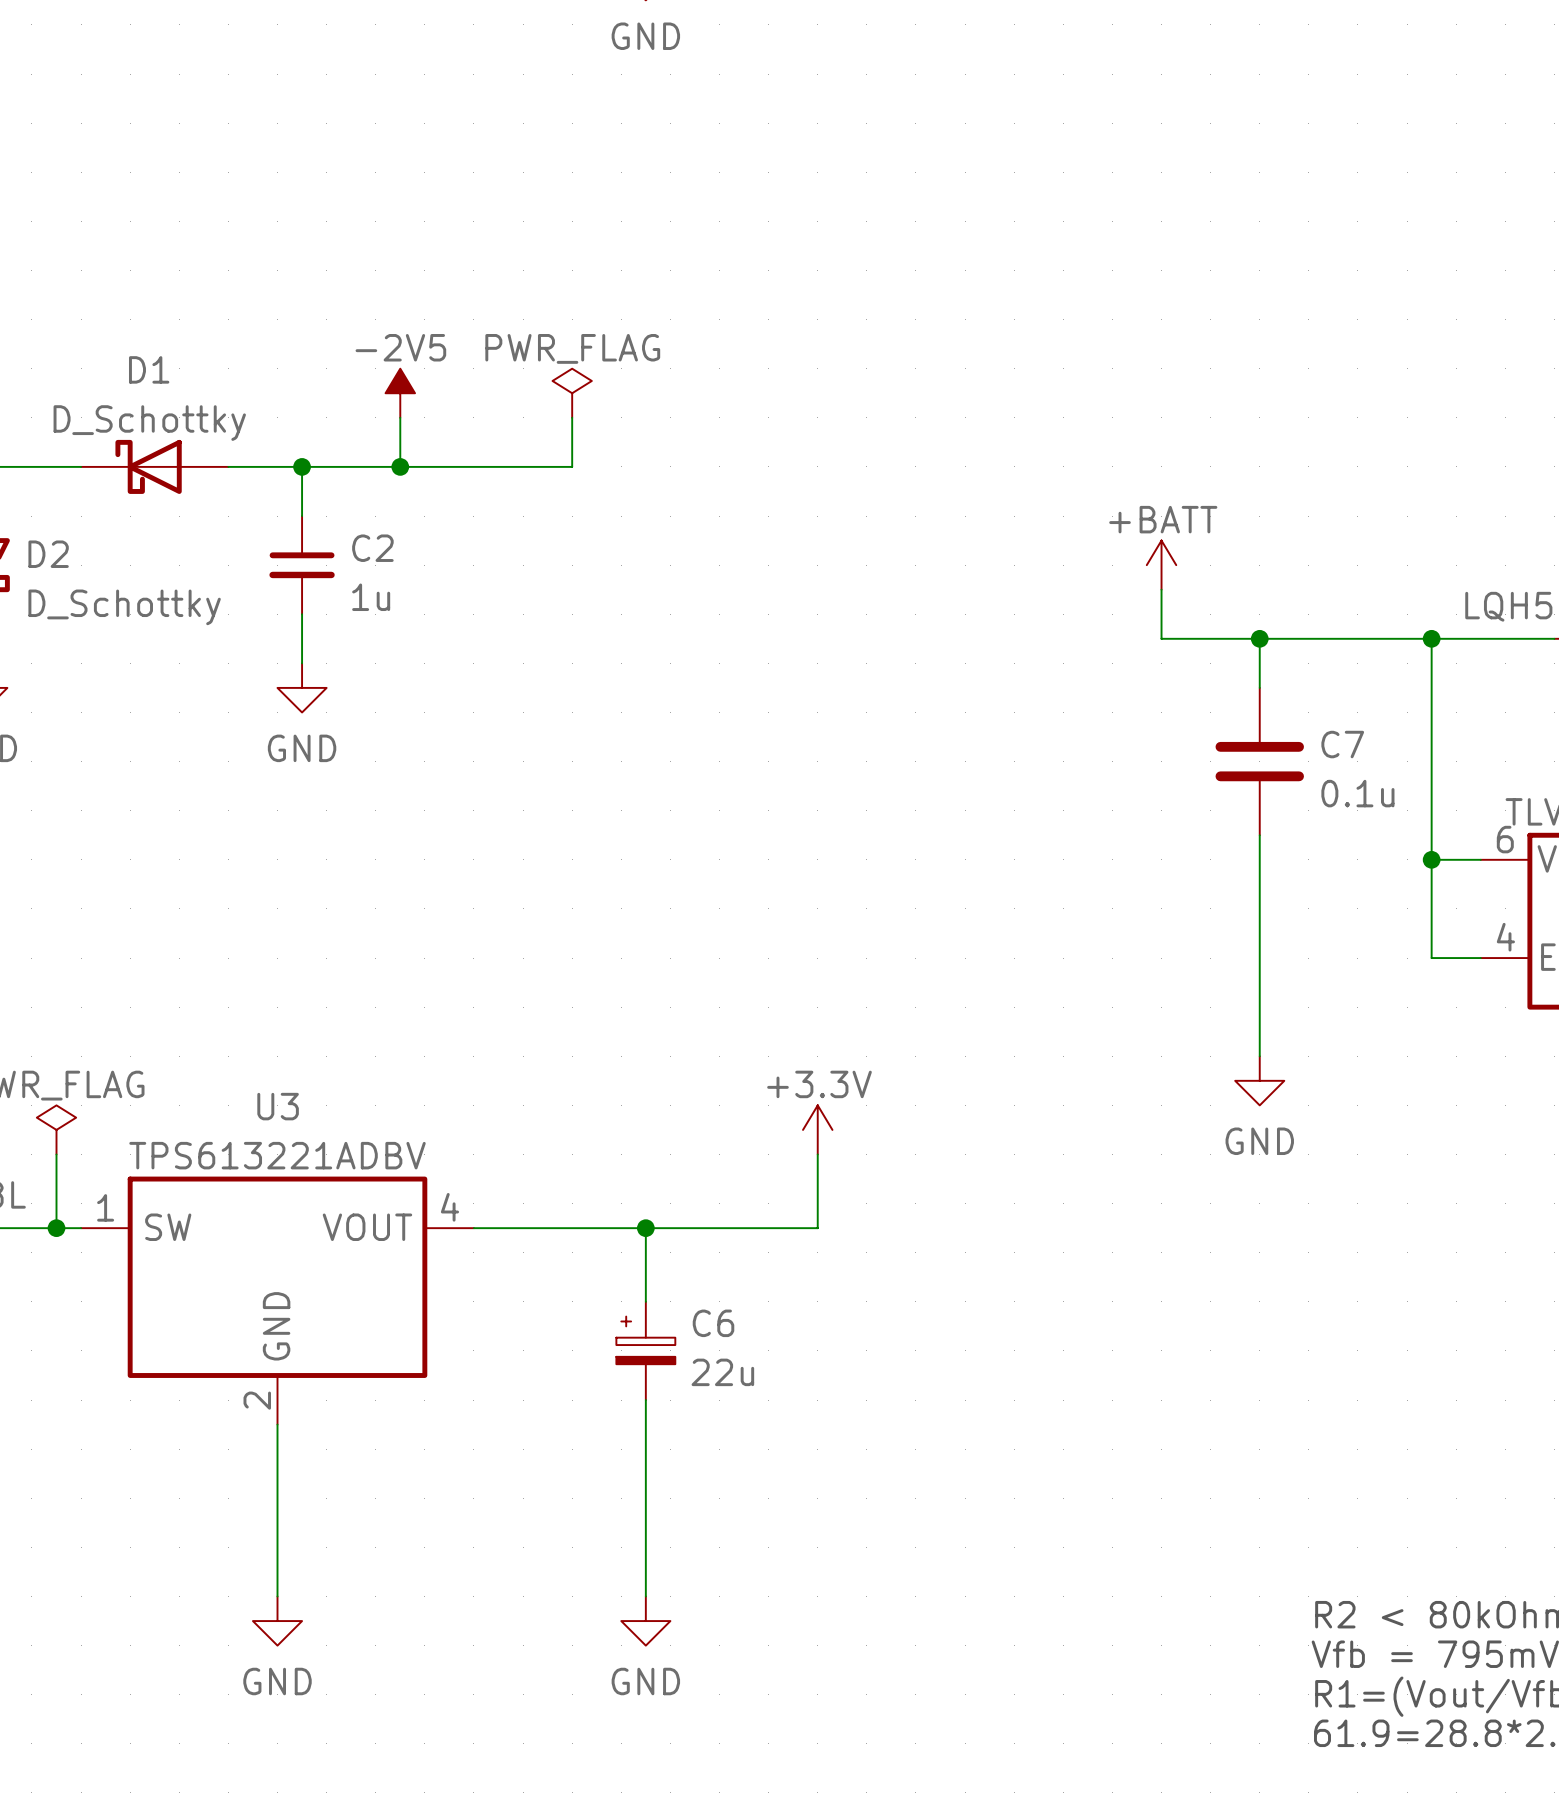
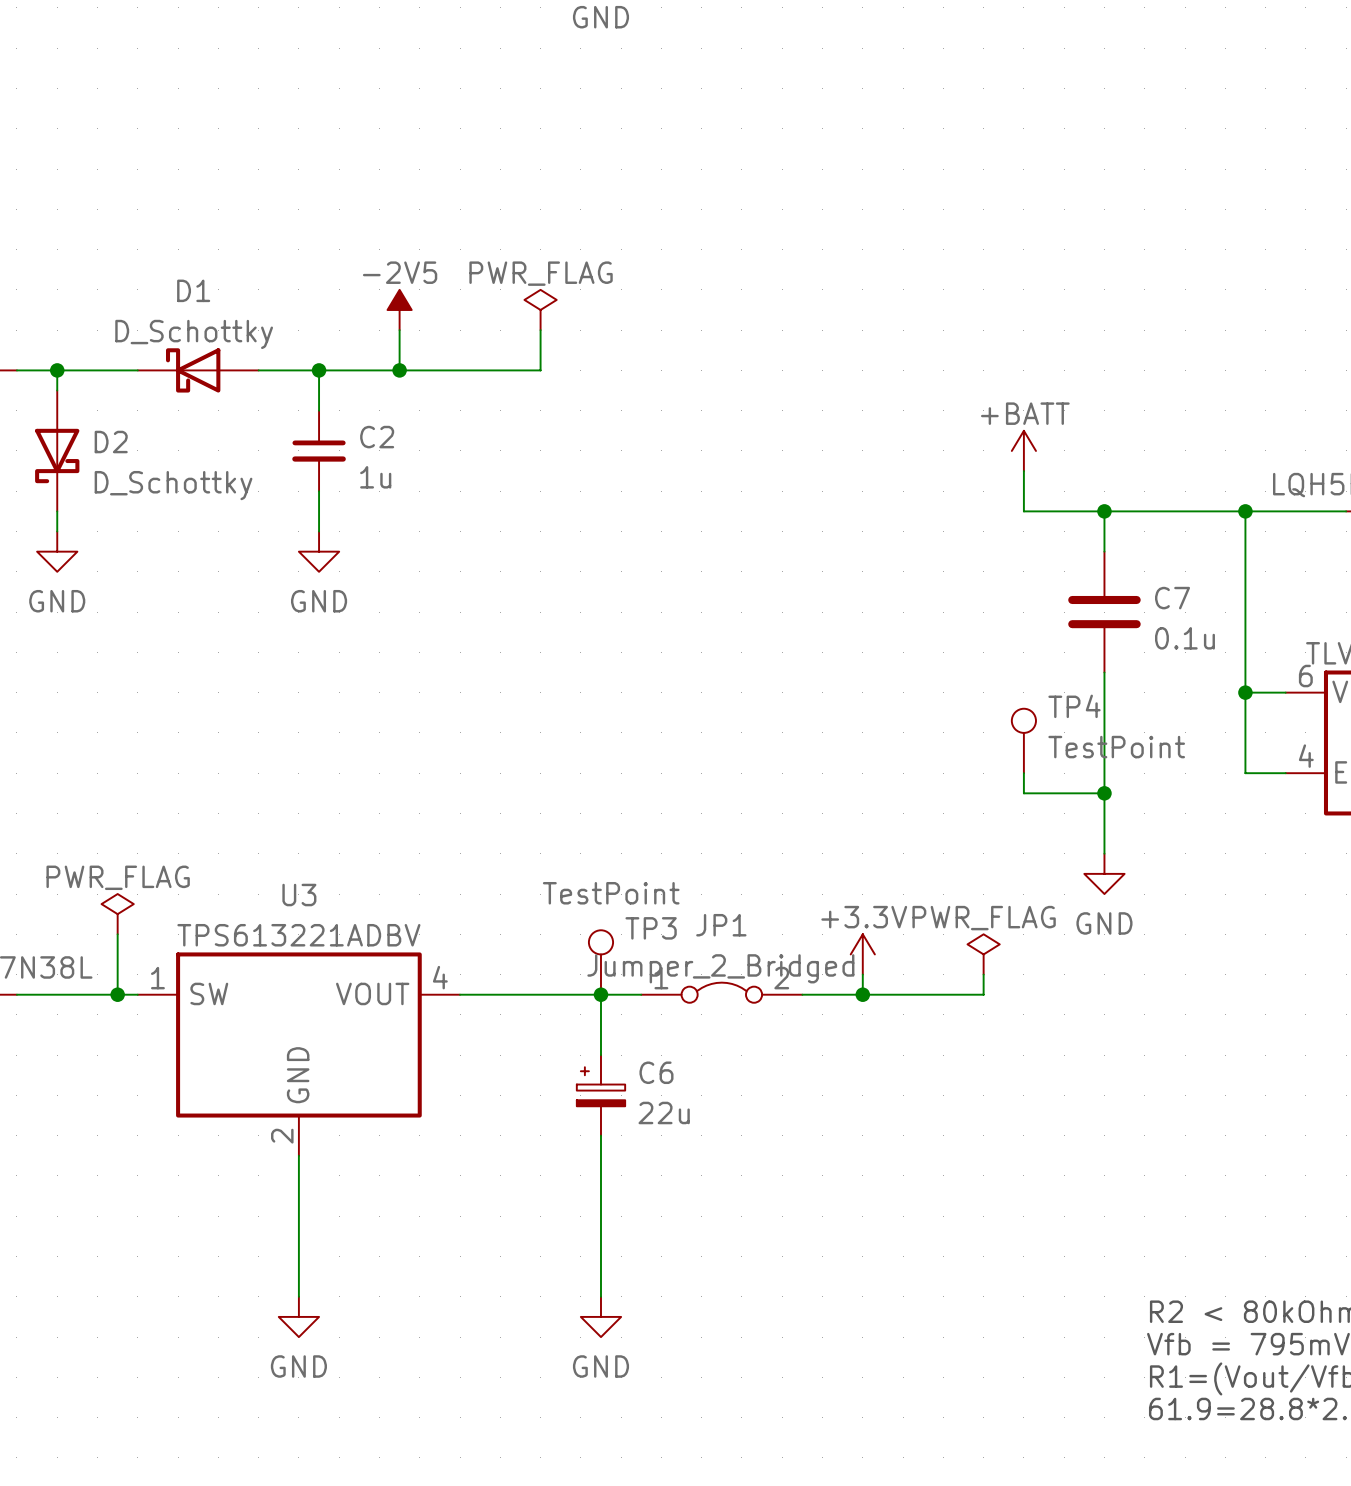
TP4: none -> TestPoint (1023, 740)
wire: none -> (1023, 773) (1023, 793) (1104, 793)
junction: none -> (1104, 793)
power symbol position: +3.3V (817, 1129) -> +3.3V (862, 954)
wire: (817, 1154) (817, 1228) (694, 1228) -> none
power symbol: none -> PWR_FLAG (983, 954)
TP3: none -> TestPoint (600, 962)
wire: none -> (862, 974) (862, 994)
wire: none -> (983, 974) (983, 994) (802, 994)
JP1: none -> Jumper_2_Bridged (721, 992)
junction: none -> (862, 994)

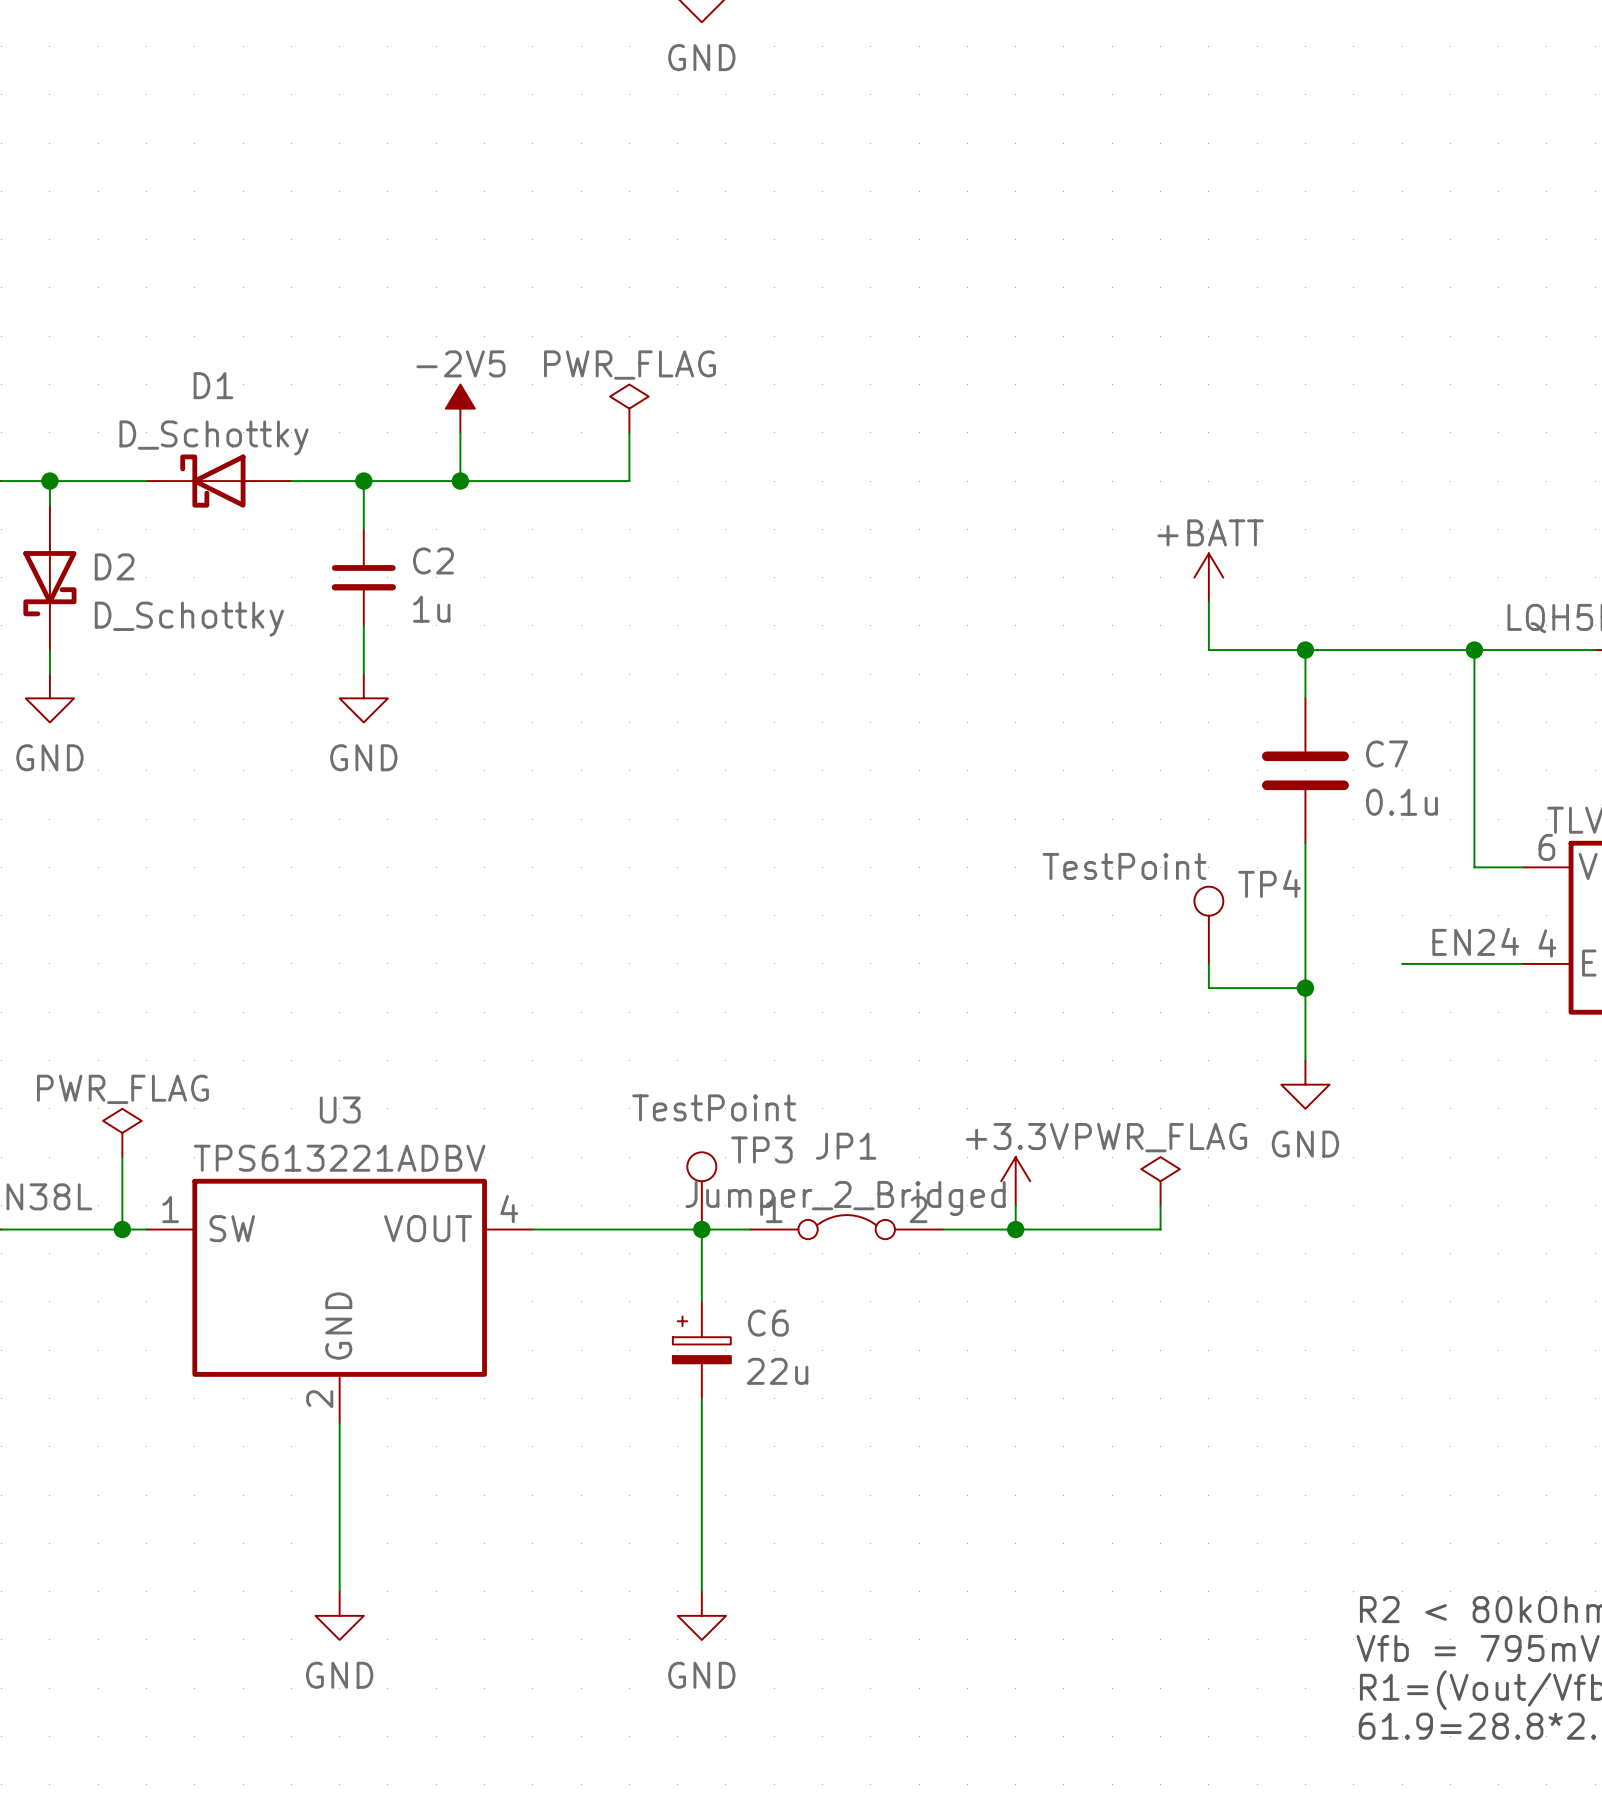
wire: (1245, 692) (1245, 773) -> (1402, 963) (1474, 963)
junction: (1245, 692) -> none
TP4 value position: TestPoint (1116, 747) -> TestPoint (1124, 866)
label: none -> EN24 (1475, 941)

